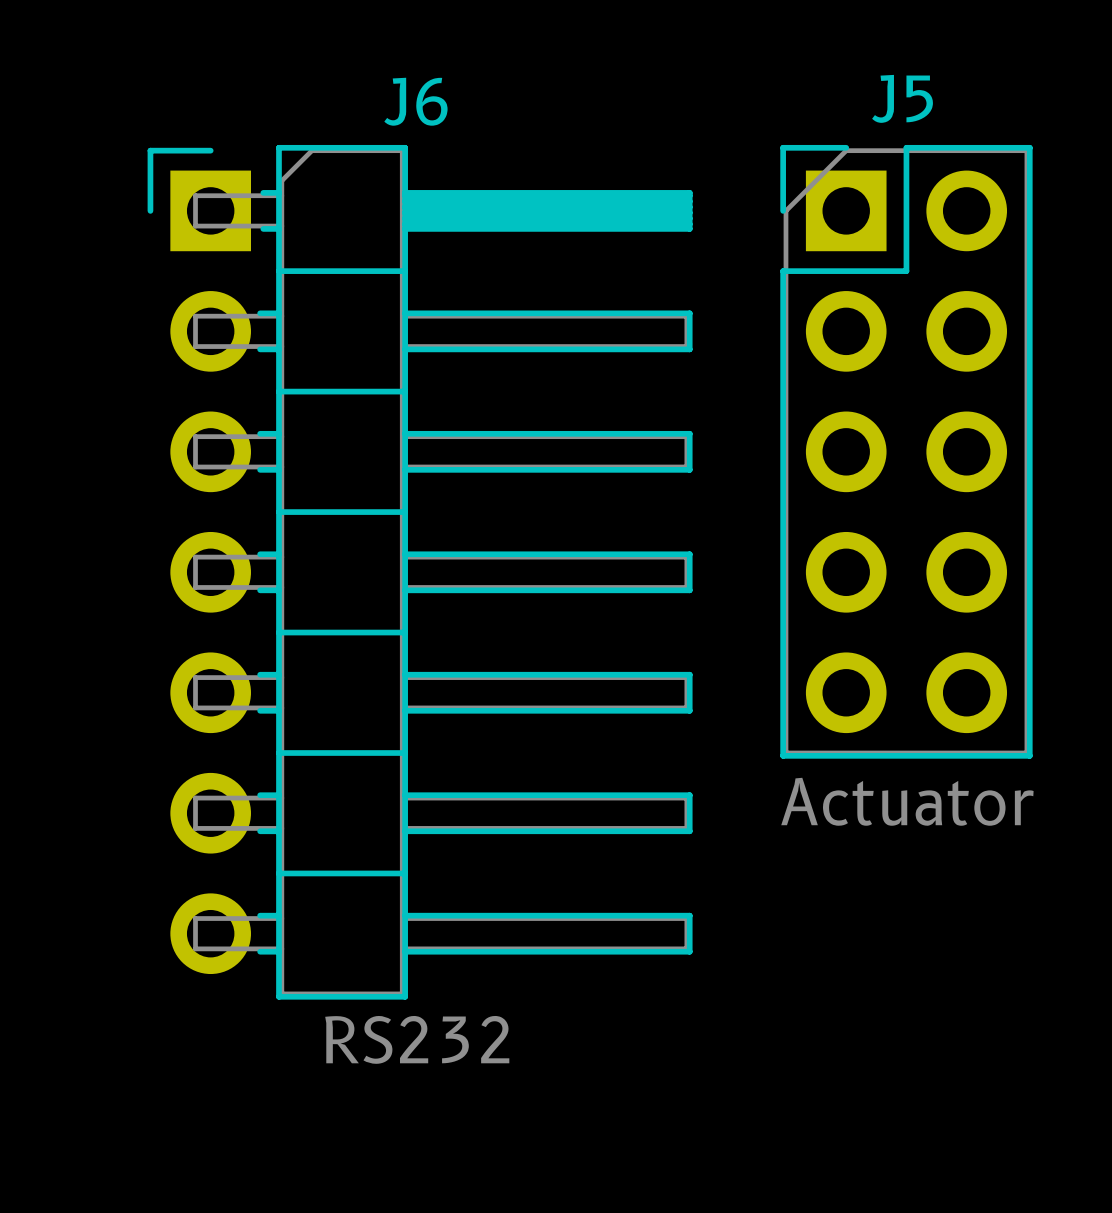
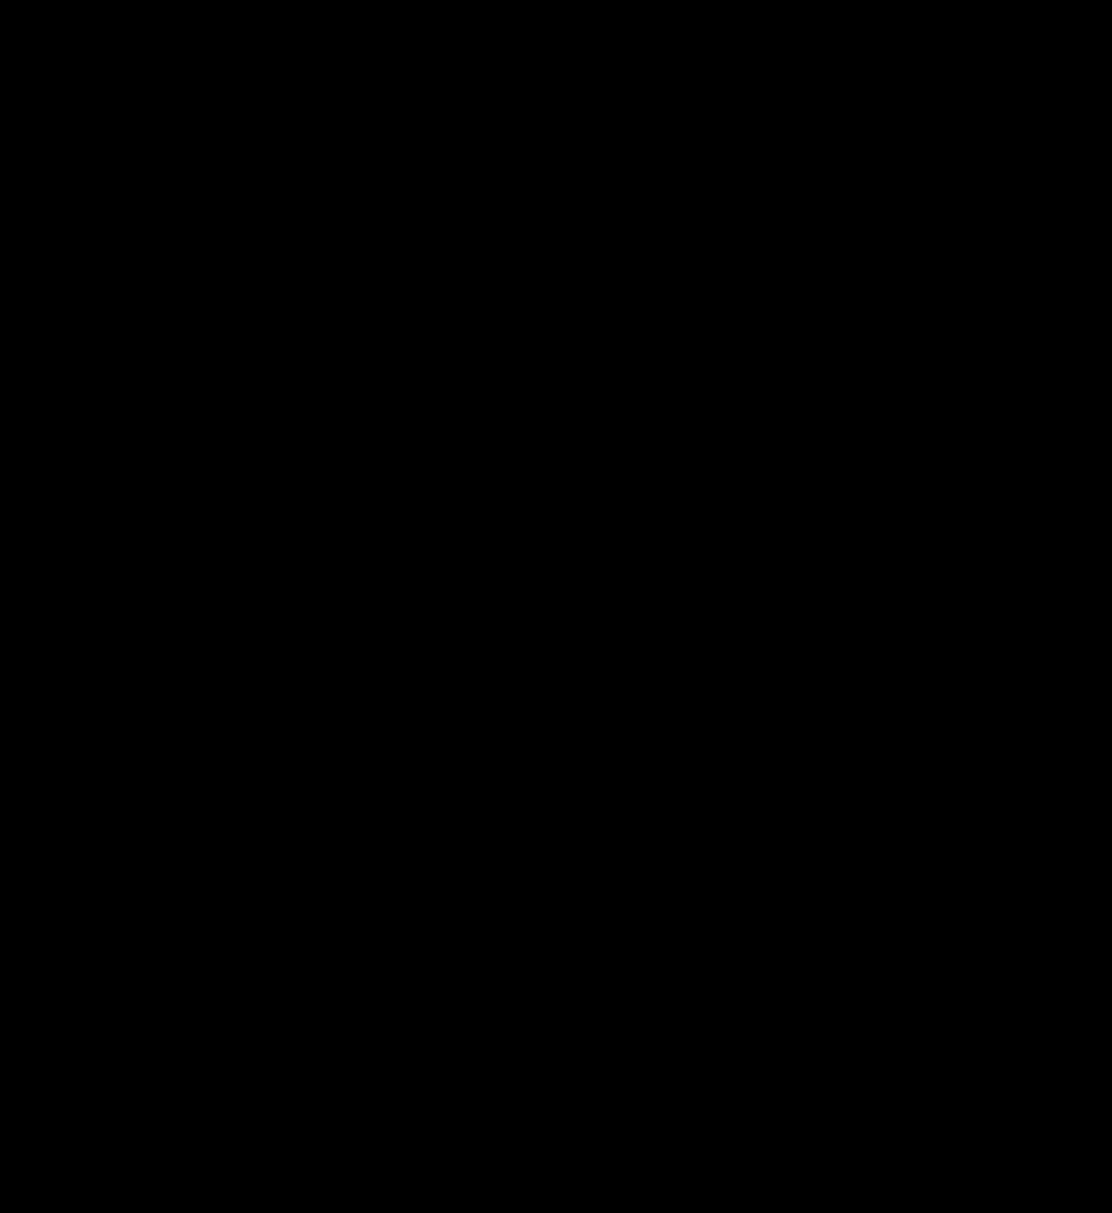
J5: Actuator (906, 451) -> none
J6: RS232 (420, 572) -> none

